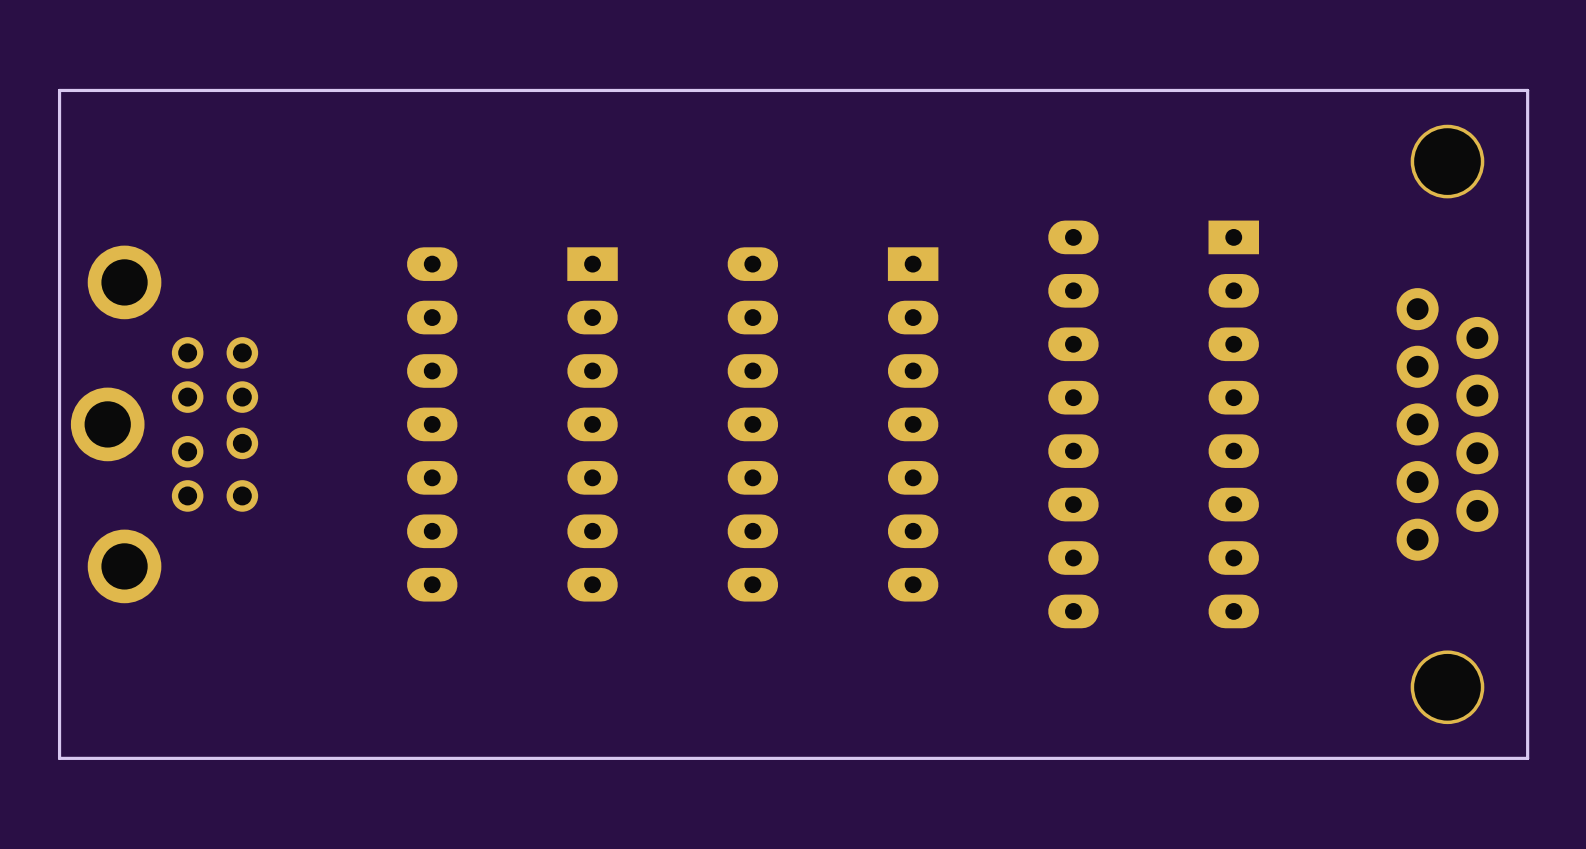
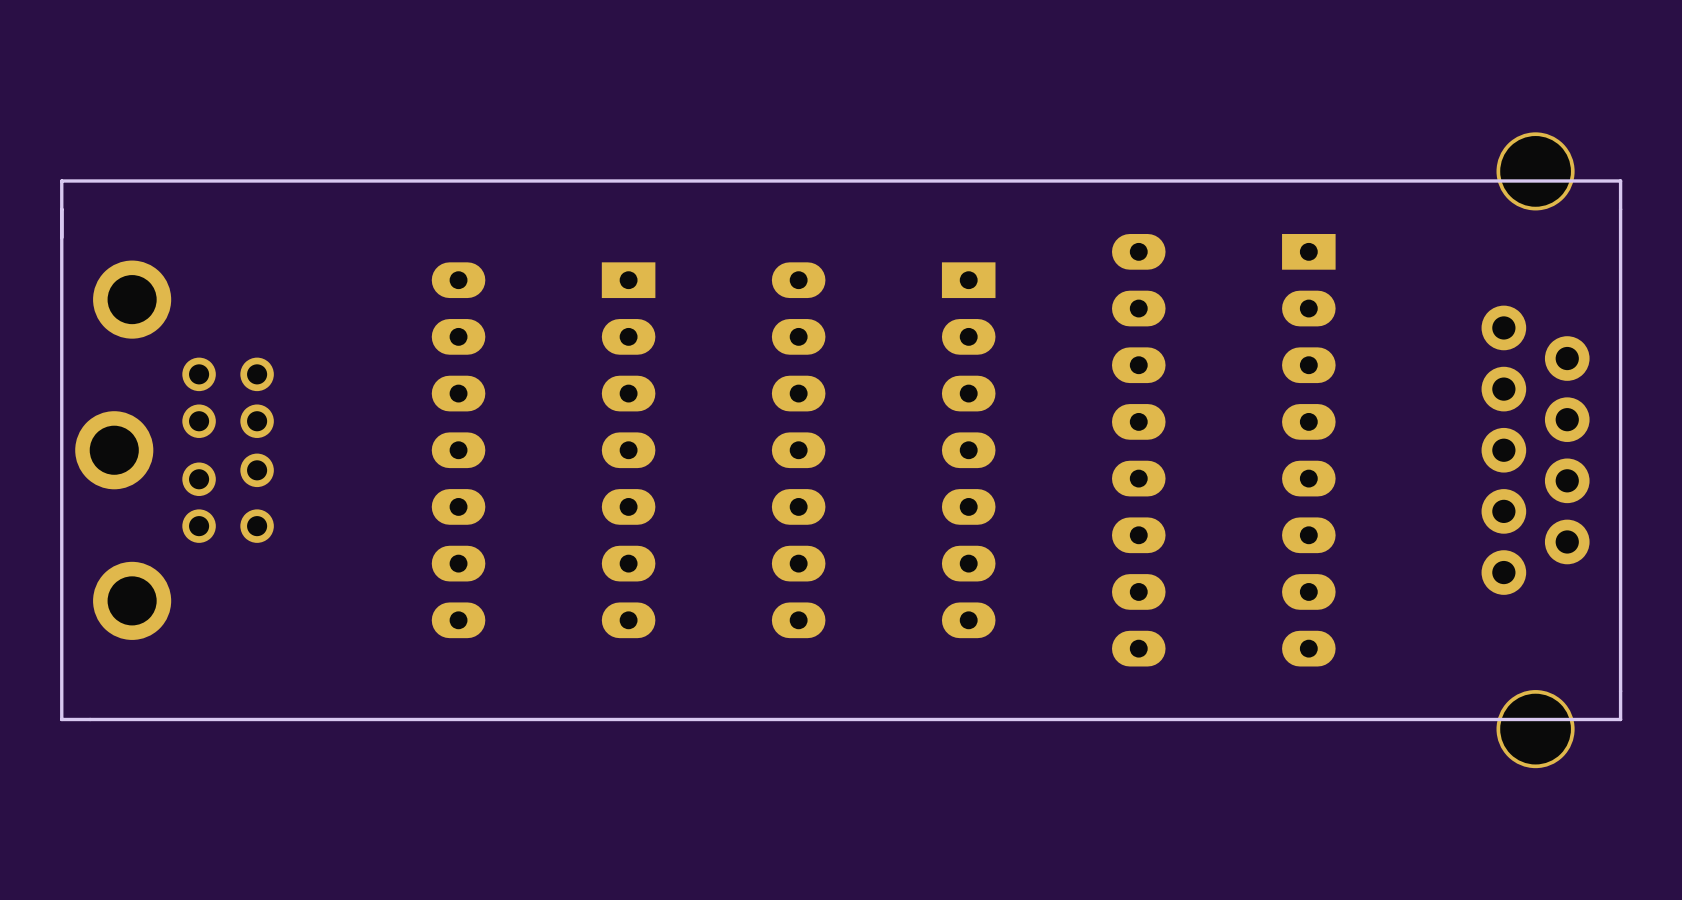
board edge: (1527, 170) (1527, 90) (59, 90) (59, 758) (1527, 758) (1527, 678) -> (1620, 180) (61, 180) (61, 719) (1620, 719)

